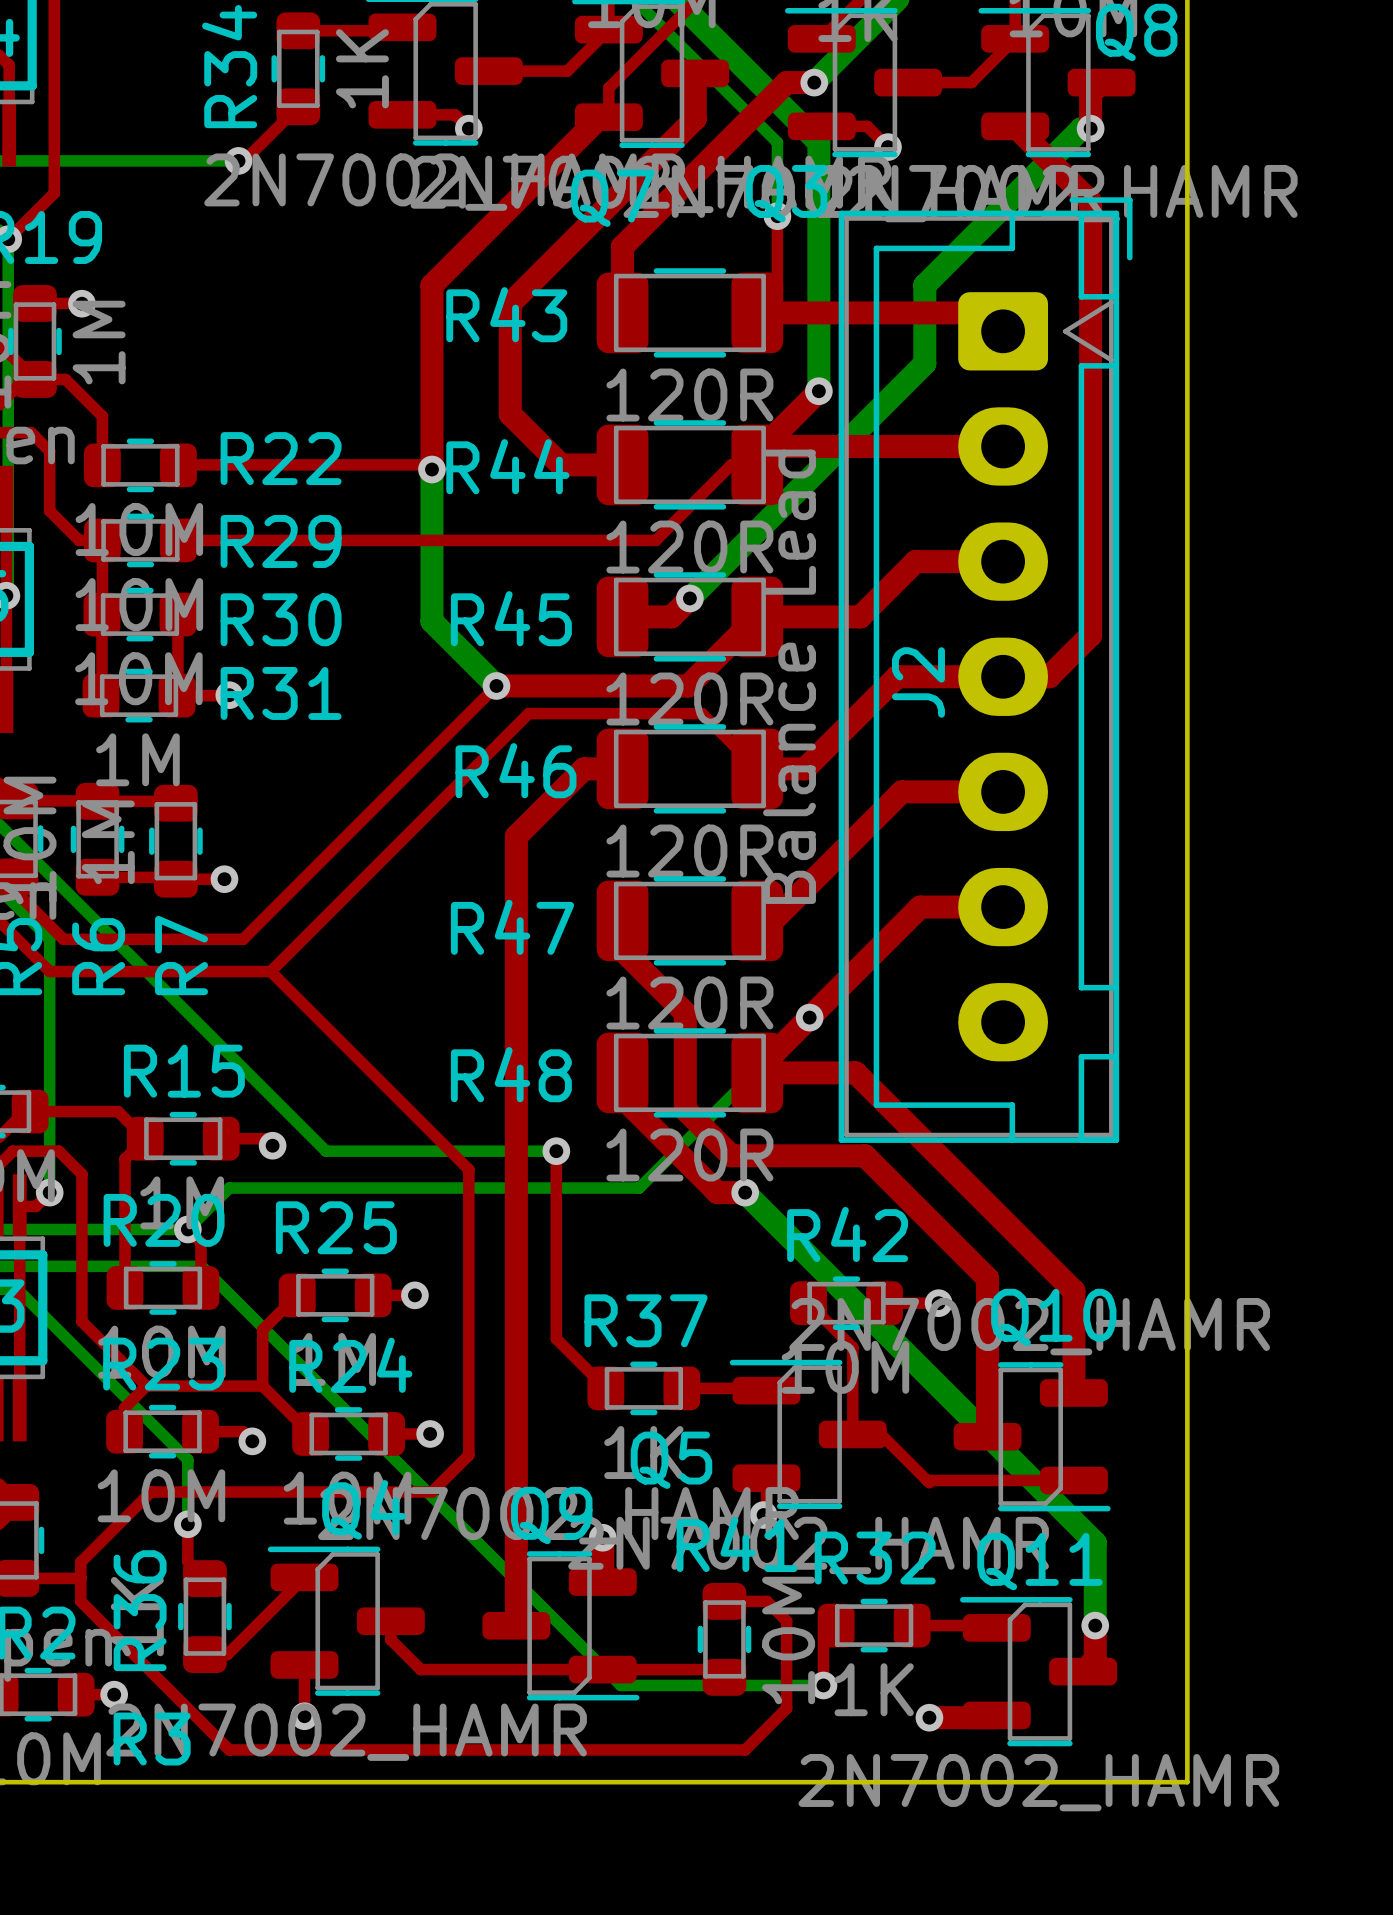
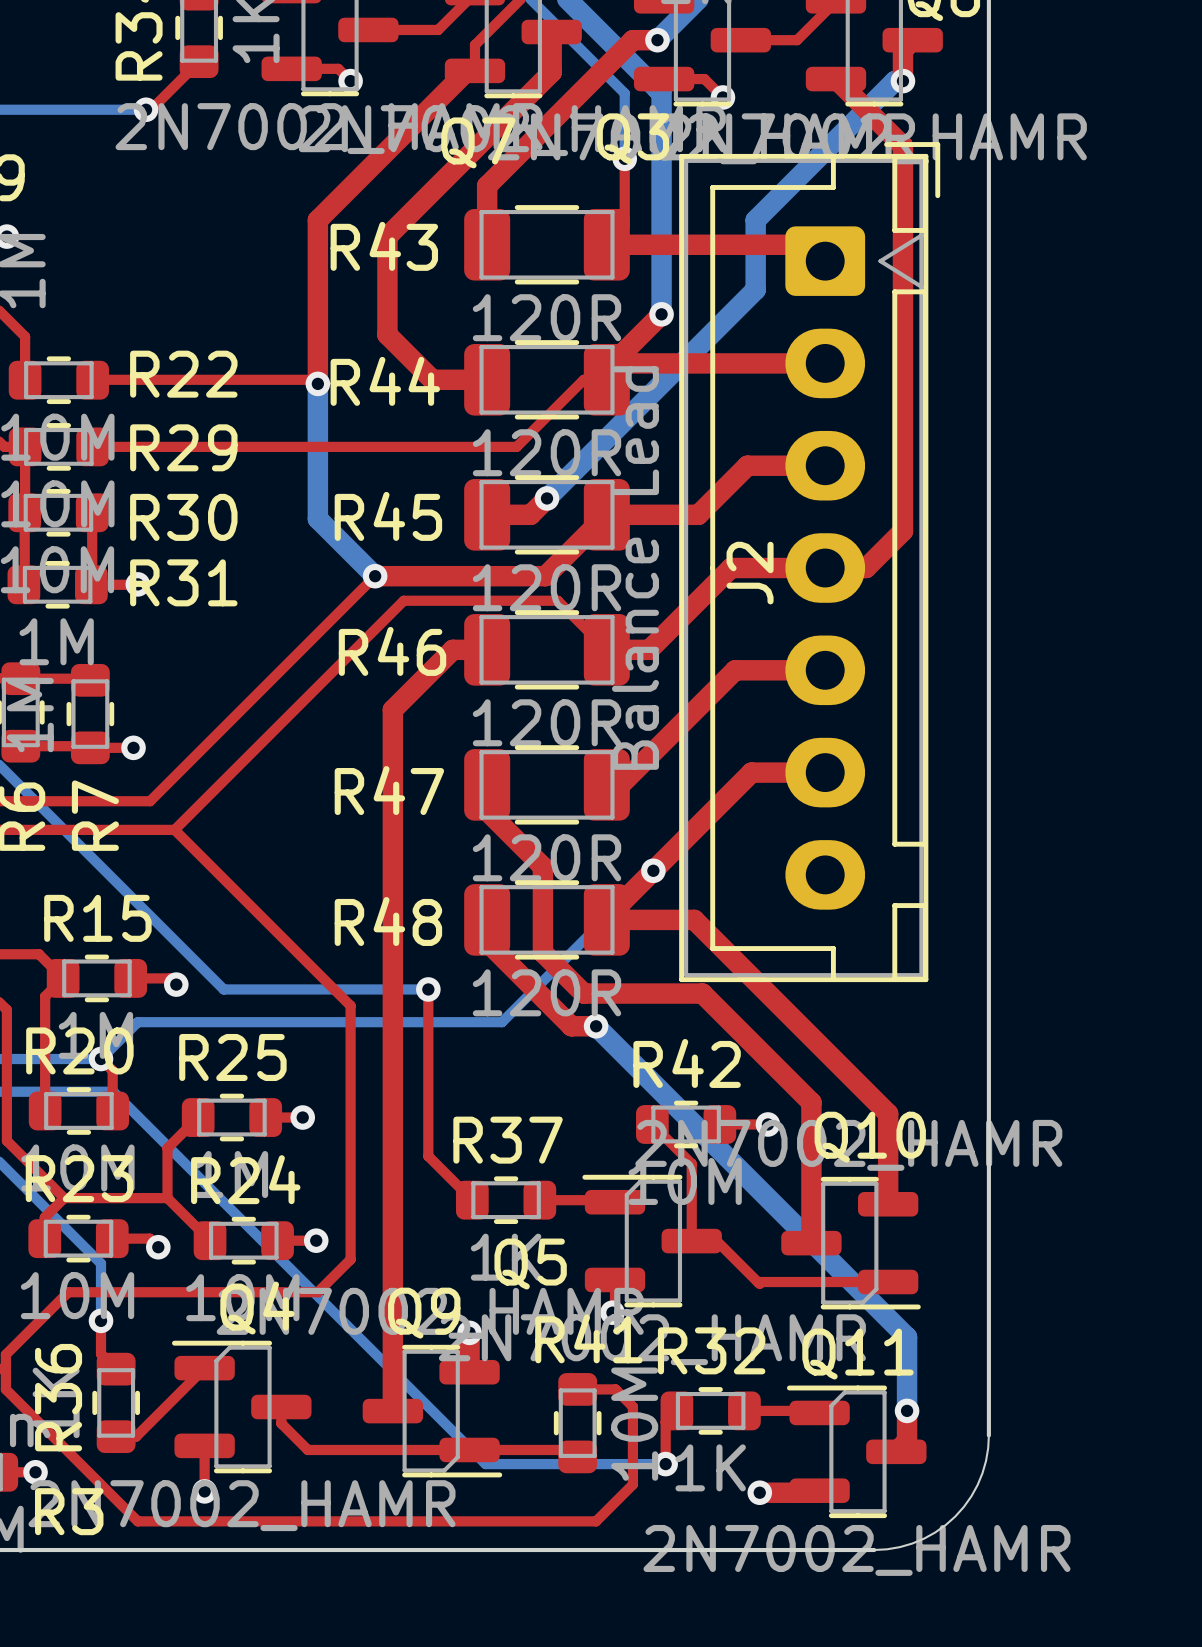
board edge: (1187, 1653) (1187, 1782) (1058, 1782) -> (988, 1435) (986, 1460) (977, 1485) (955, 1516) (935, 1532) (912, 1543) (874, 1550)

